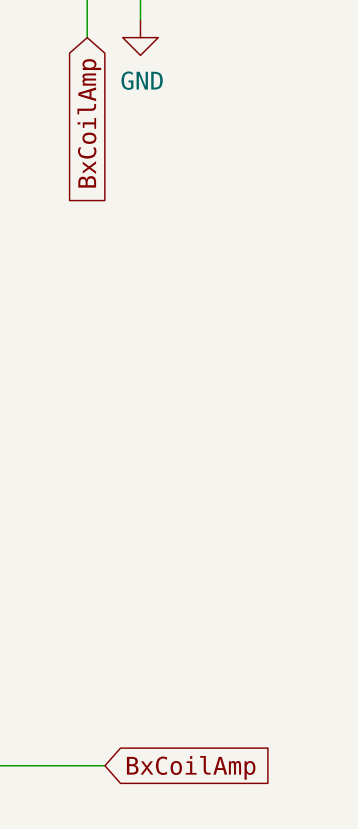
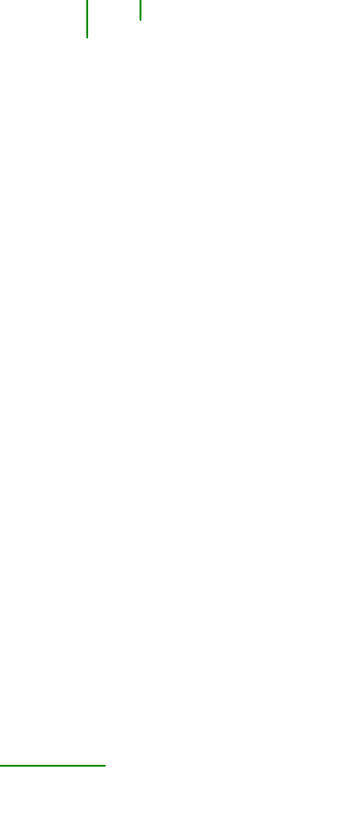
power symbol: GND (140, 37) -> none
global label: BxCoilAmp (89, 123) -> none
global label: BxCoilAmp (191, 767) -> none

